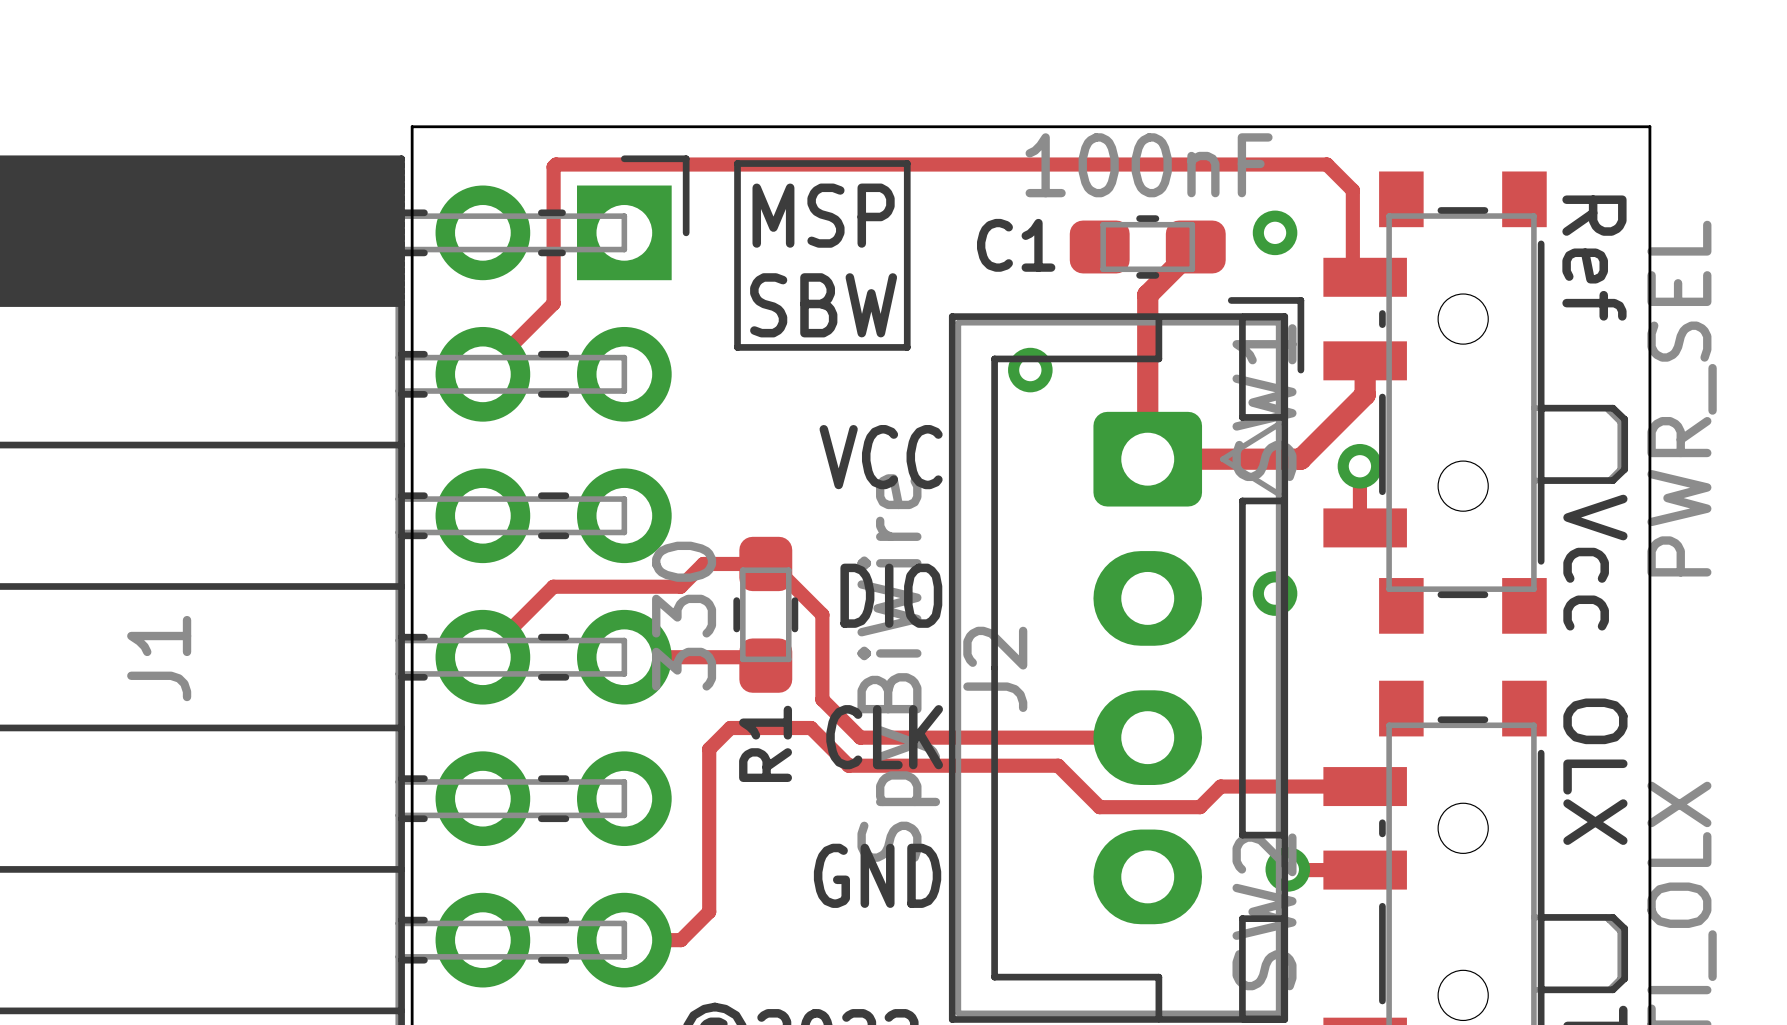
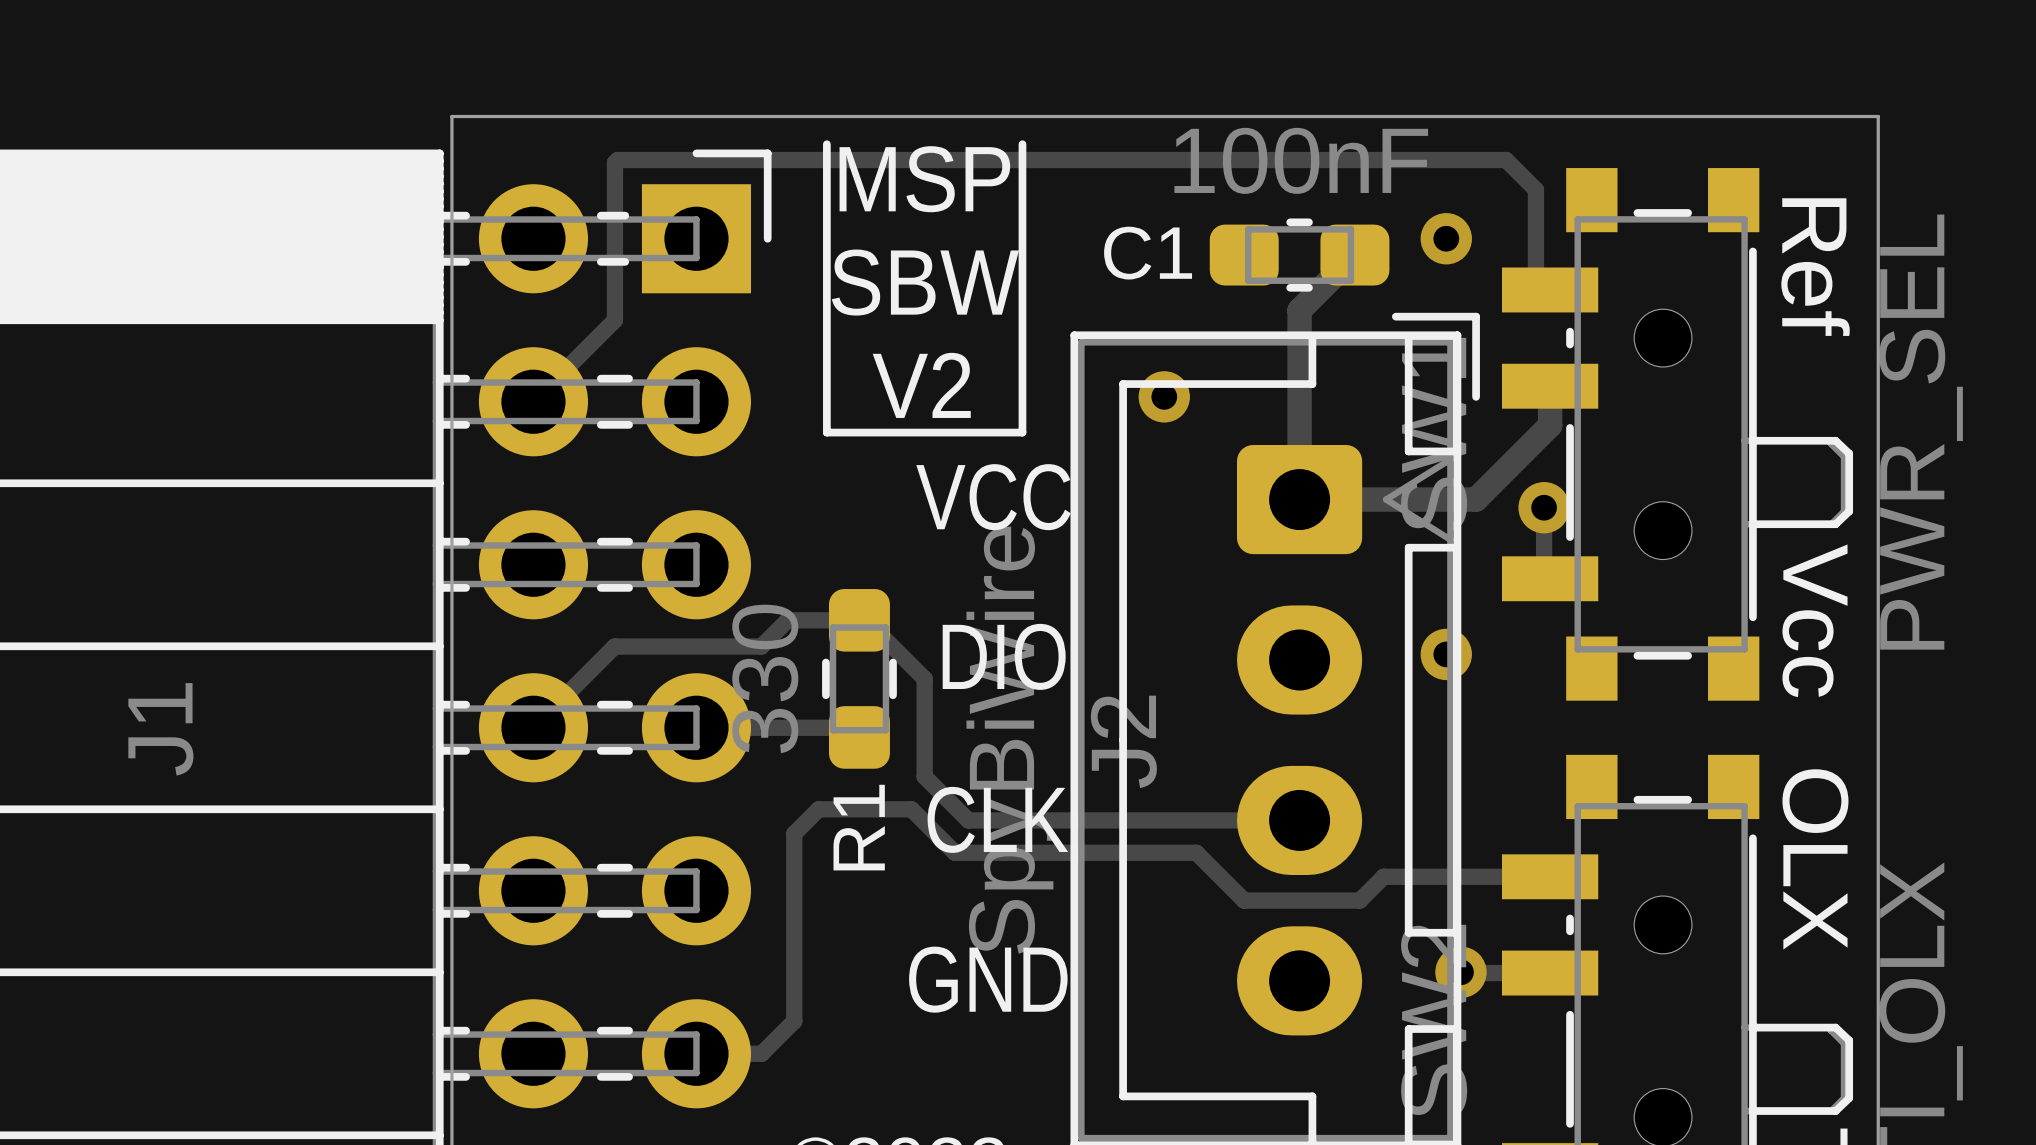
line: none -> (1022, 144) (1022, 158)
line: (737, 163) (907, 163) -> (826, 158) (826, 144)
text position: MSP (823, 215) -> MSP (924, 179)
text position: SBW (823, 305) -> SBW (925, 282)
line: (737, 347) (907, 347) -> (826, 370) (826, 432) (1022, 432) (1022, 370)
text: none -> V2 (921, 385)

